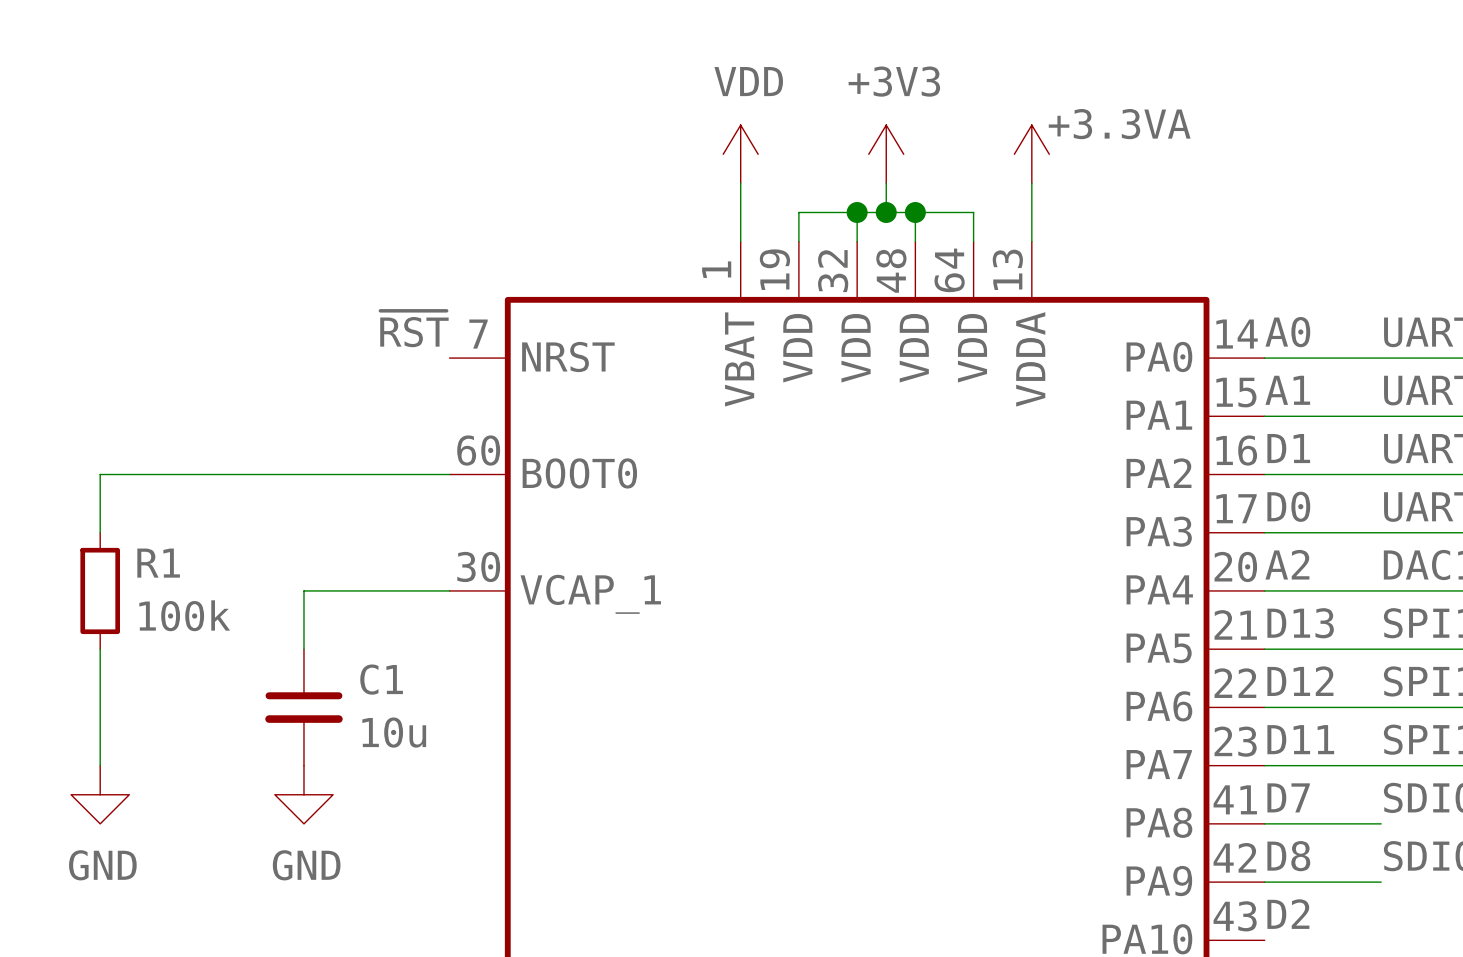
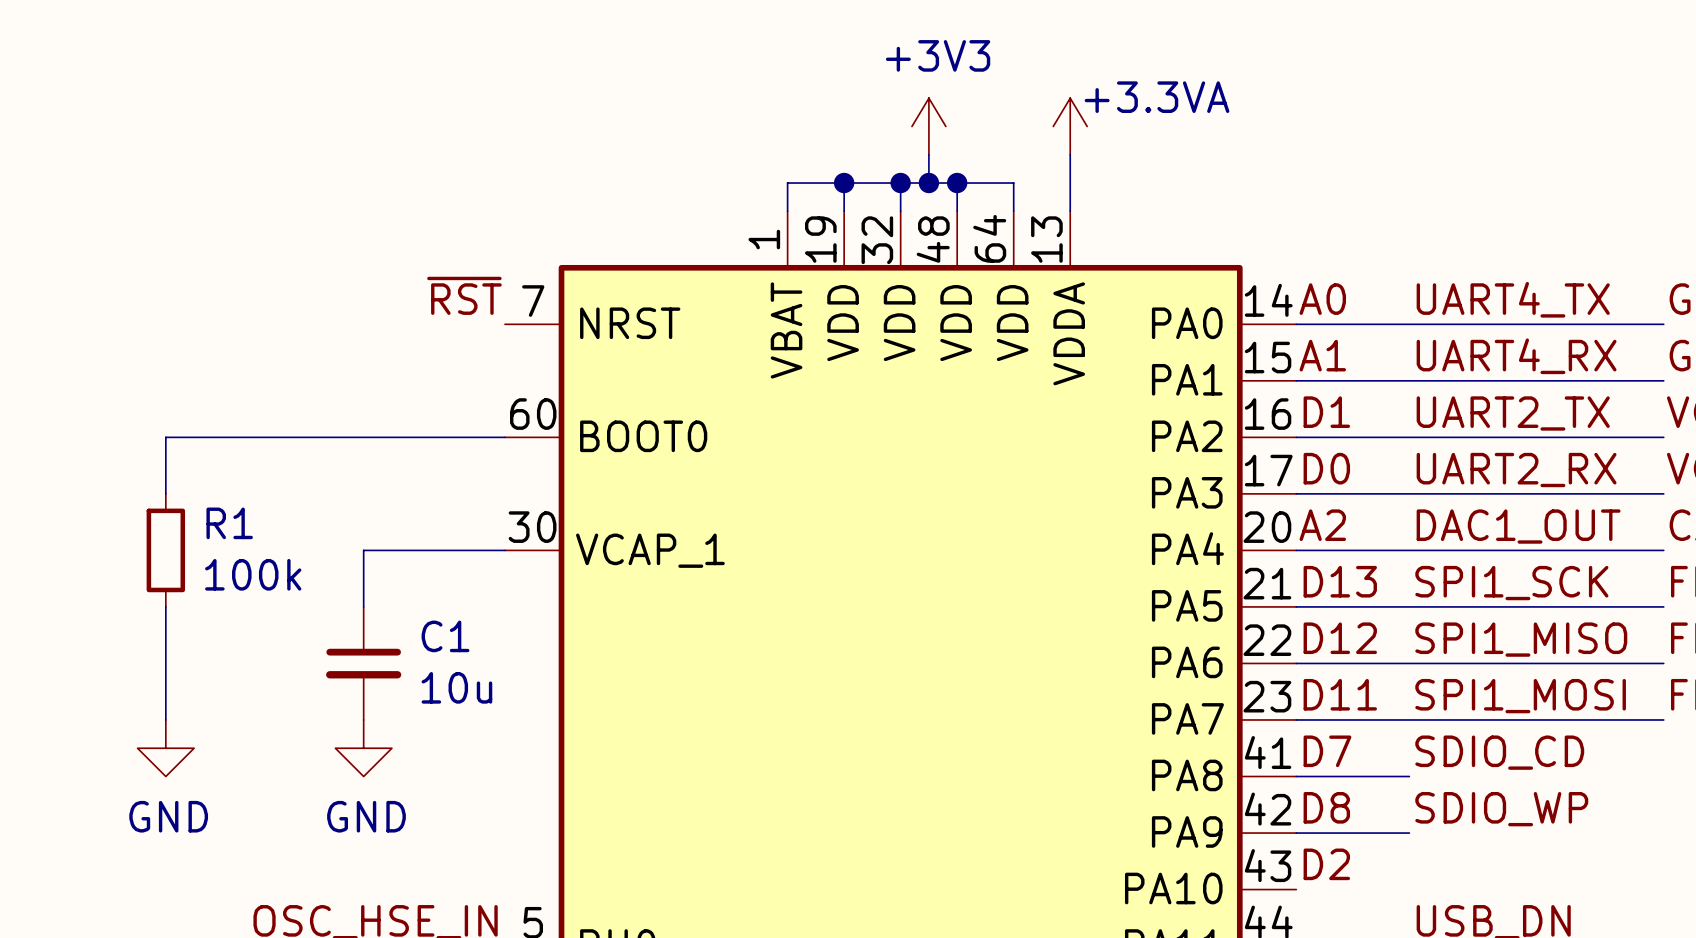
power symbol: VDD (740, 154) -> none
wire: (740, 183) (740, 212) -> (844, 183) (787, 183)
junction: none -> (844, 183)

